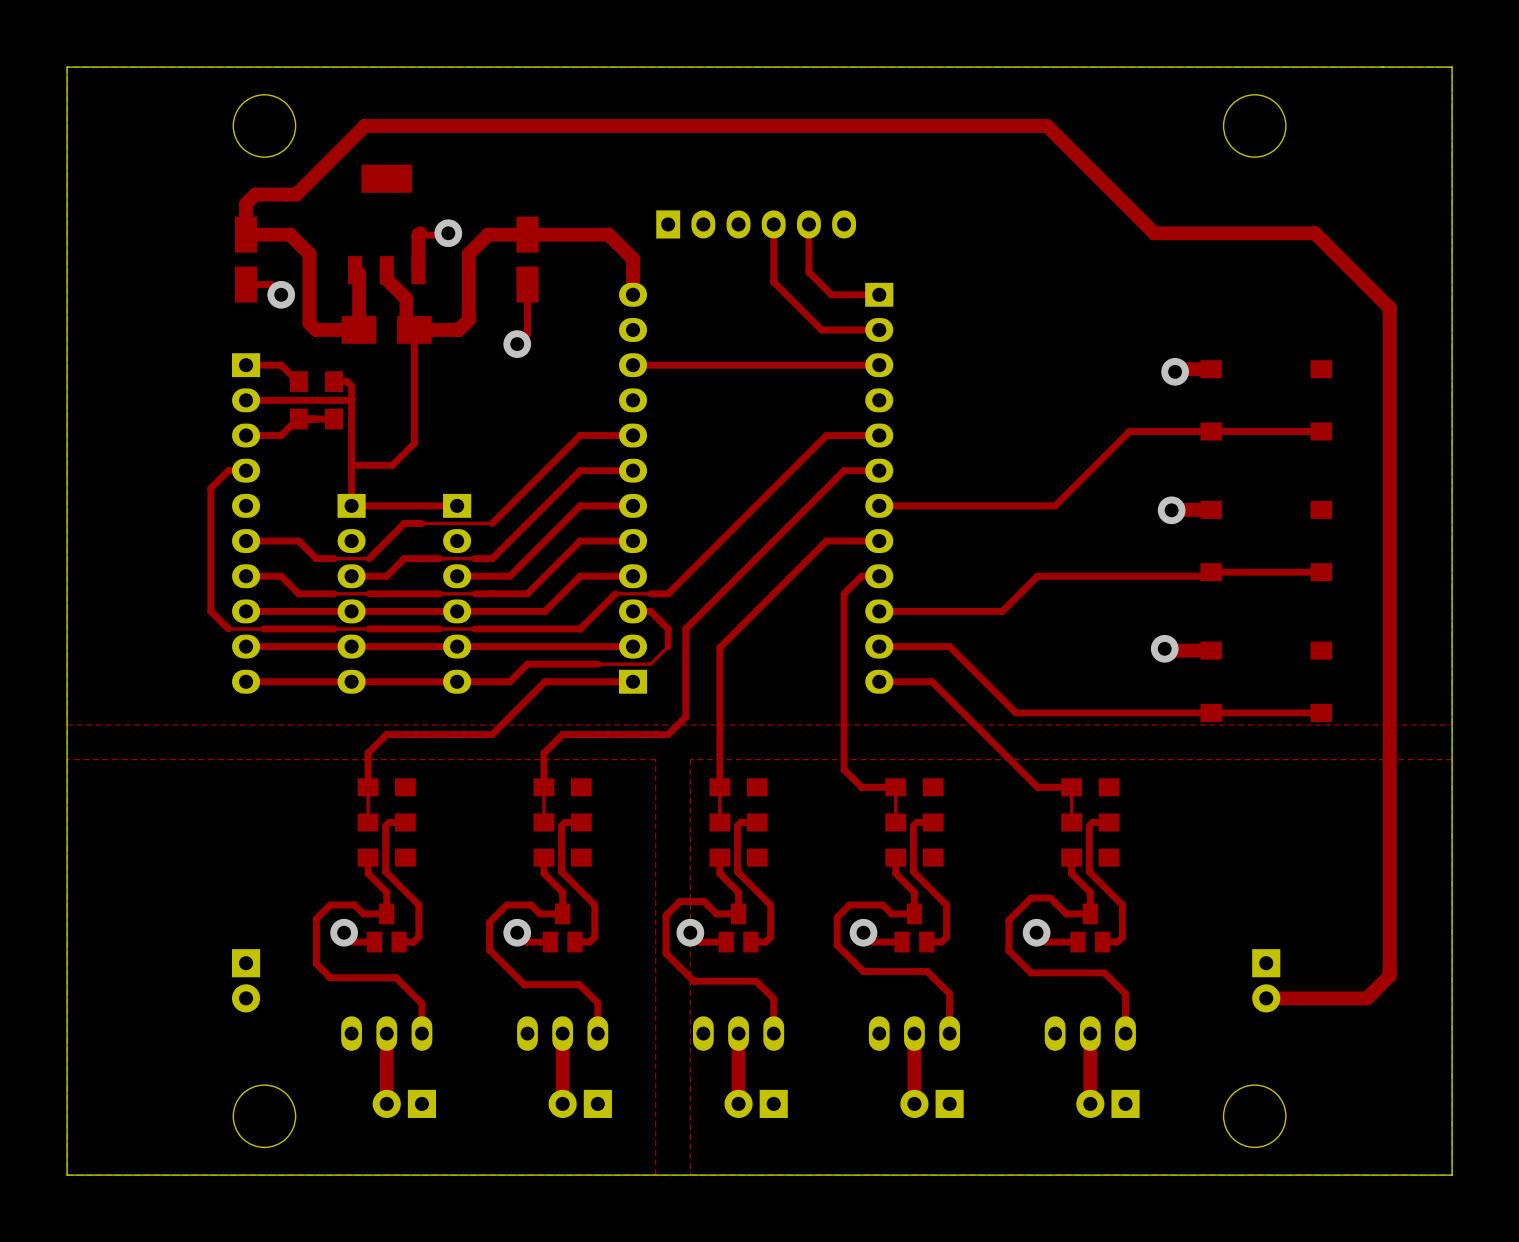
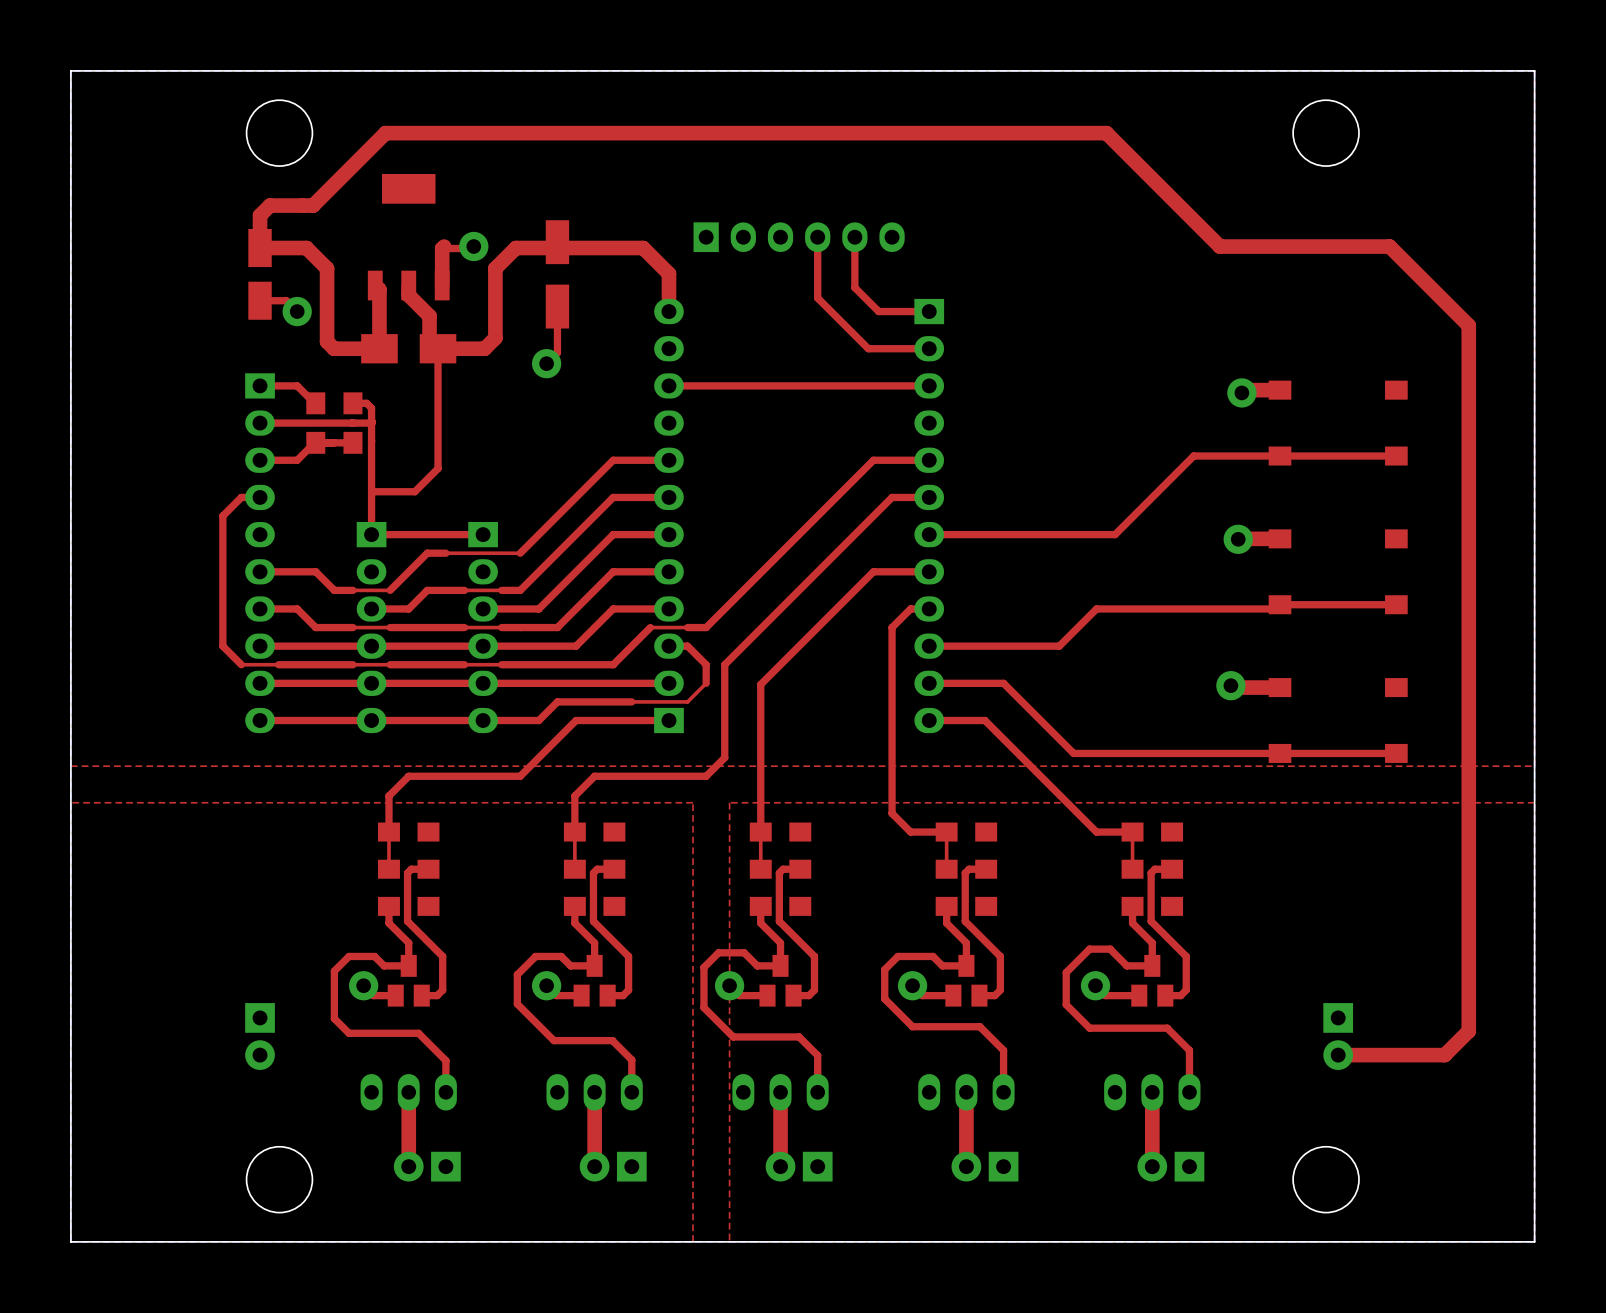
part footprint: [516, 216, 539, 303] -> [545, 220, 570, 329]

